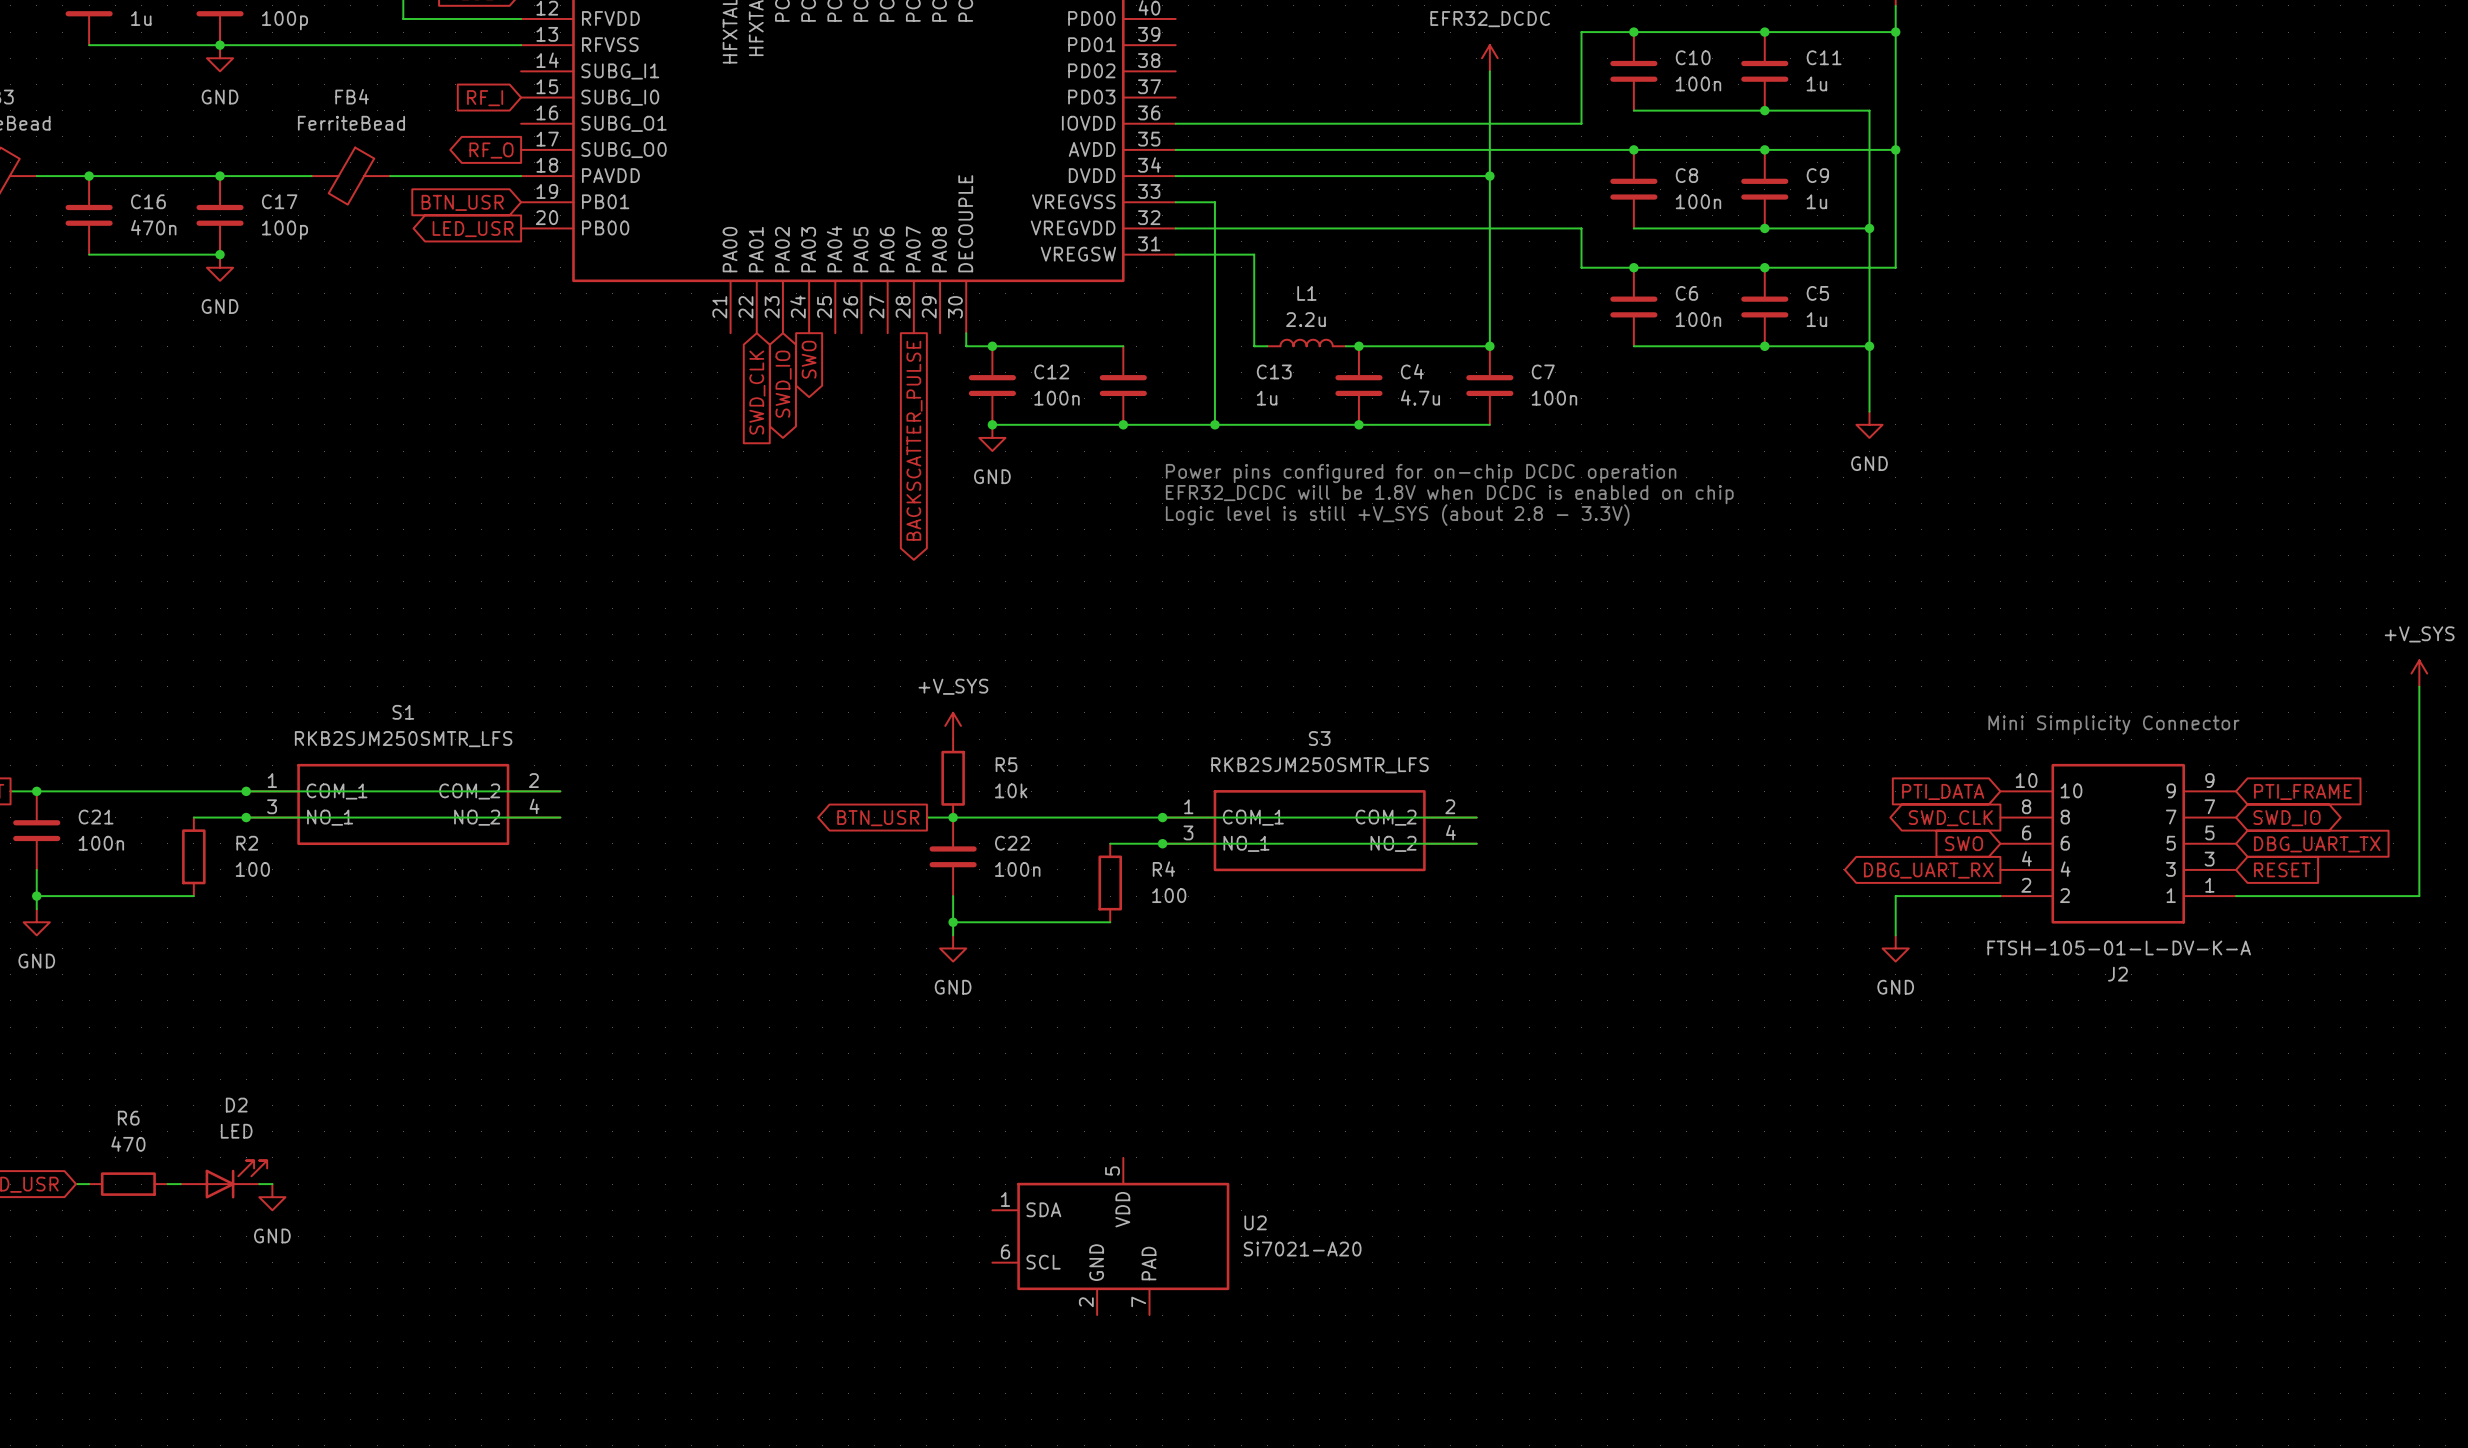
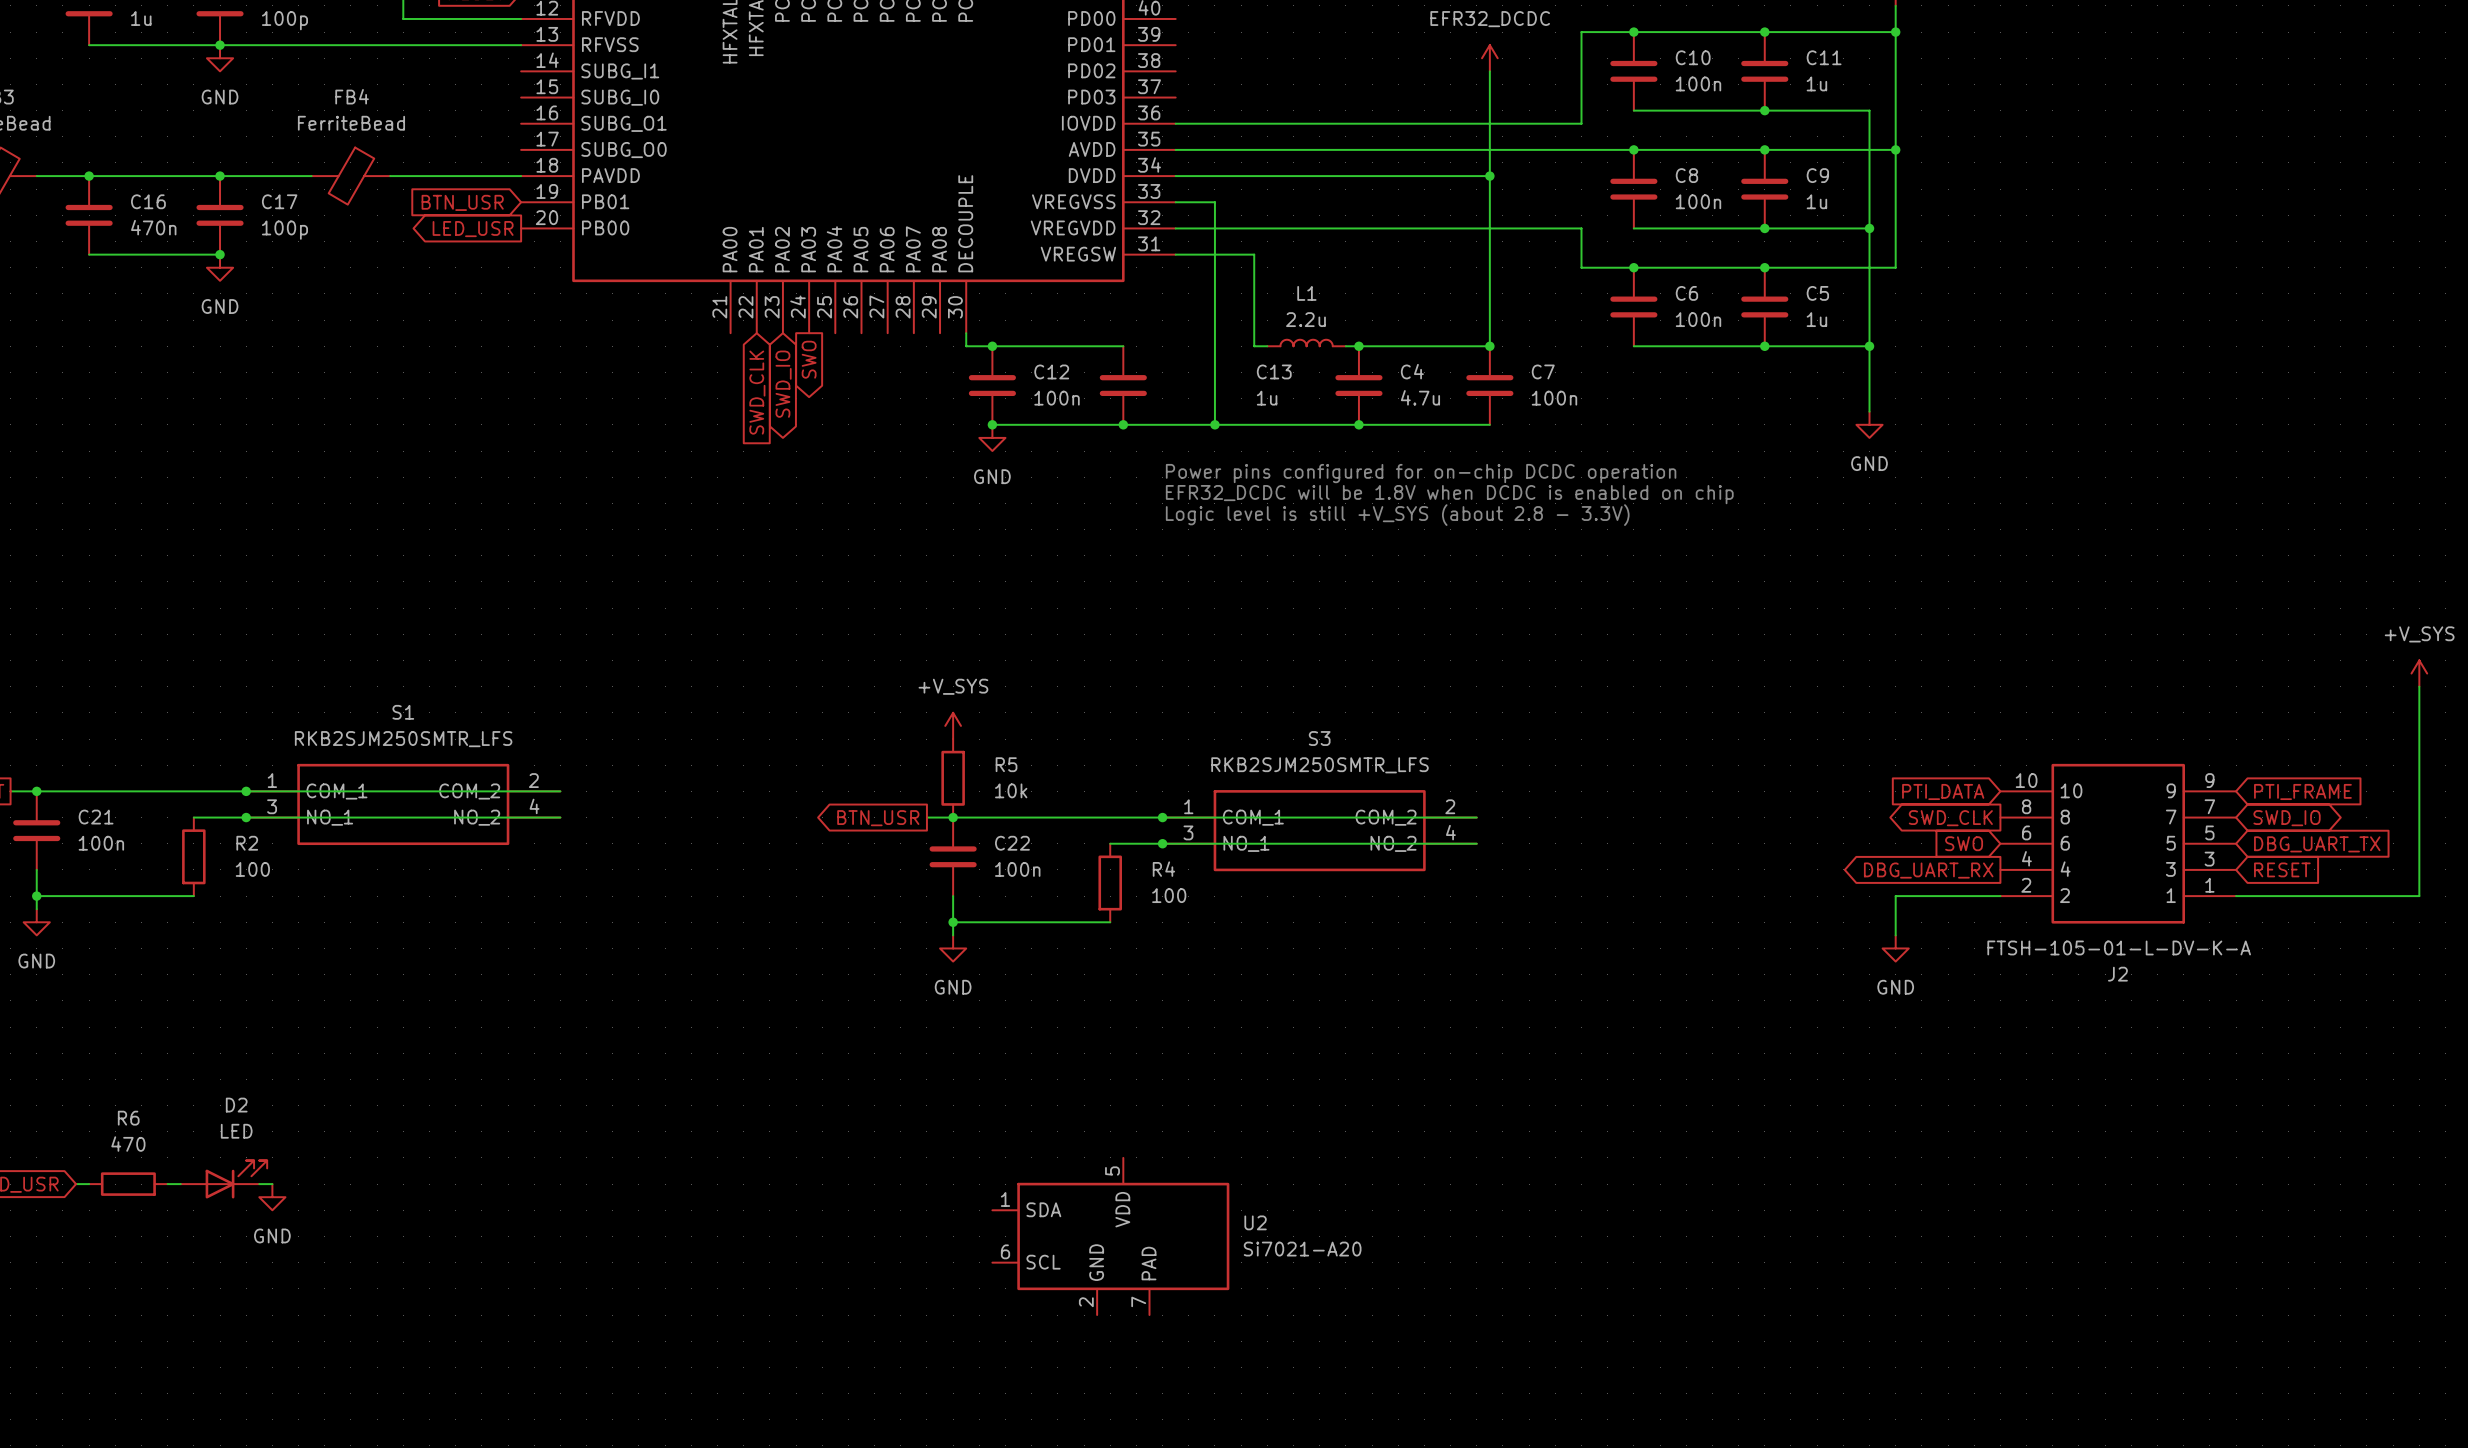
global label: RF_I (485, 98) -> none
global label: RF_O (491, 150) -> none
global label: BACKSCATTER_PULSE (914, 440) -> none
text: Mini Simplicity Connector (2113, 725) -> none

